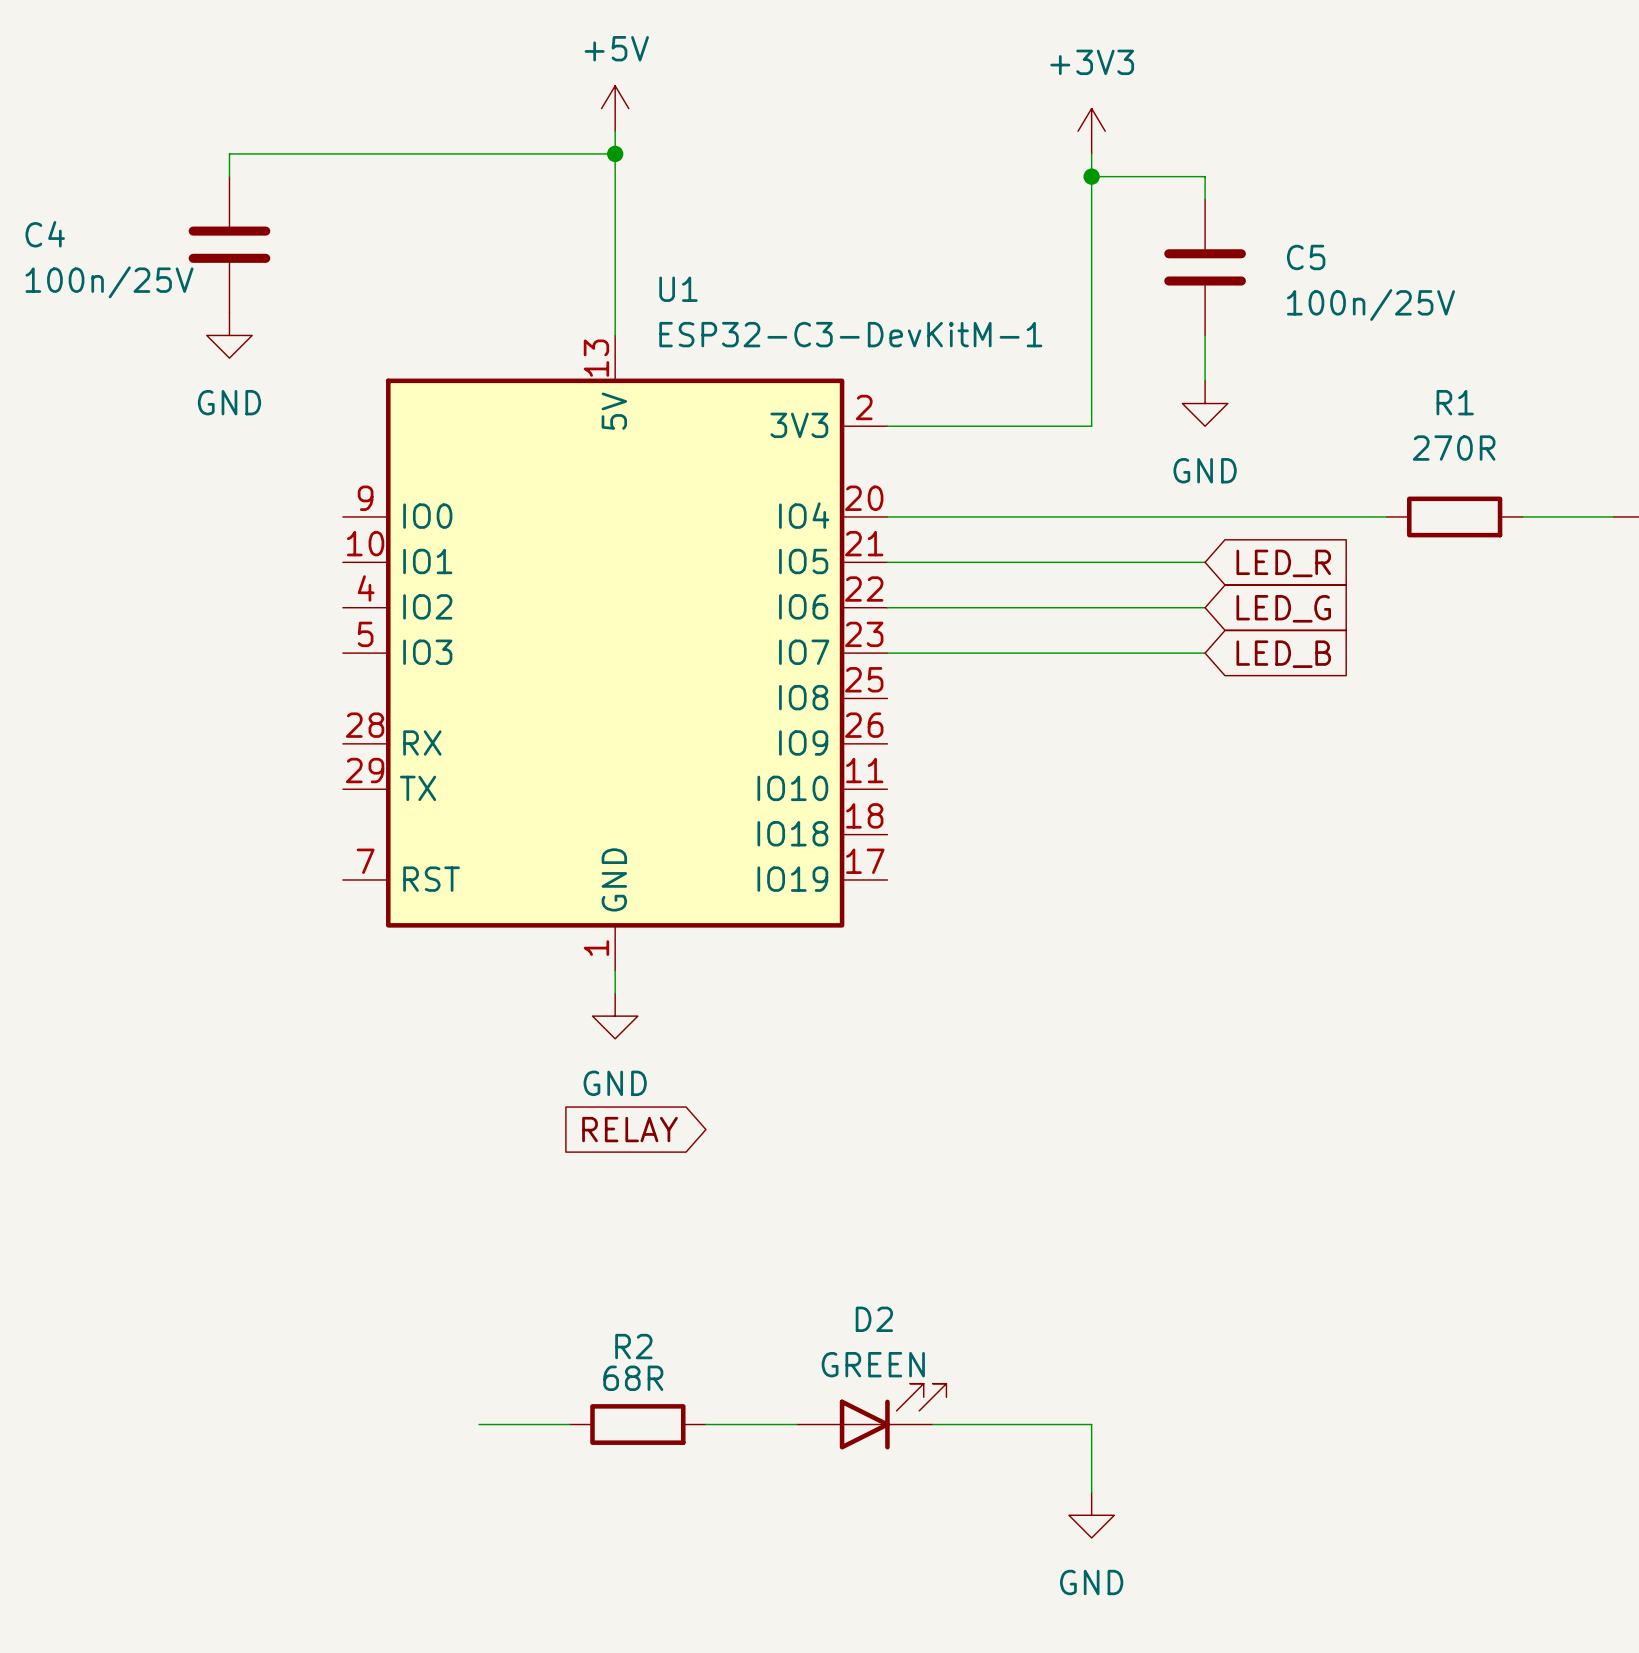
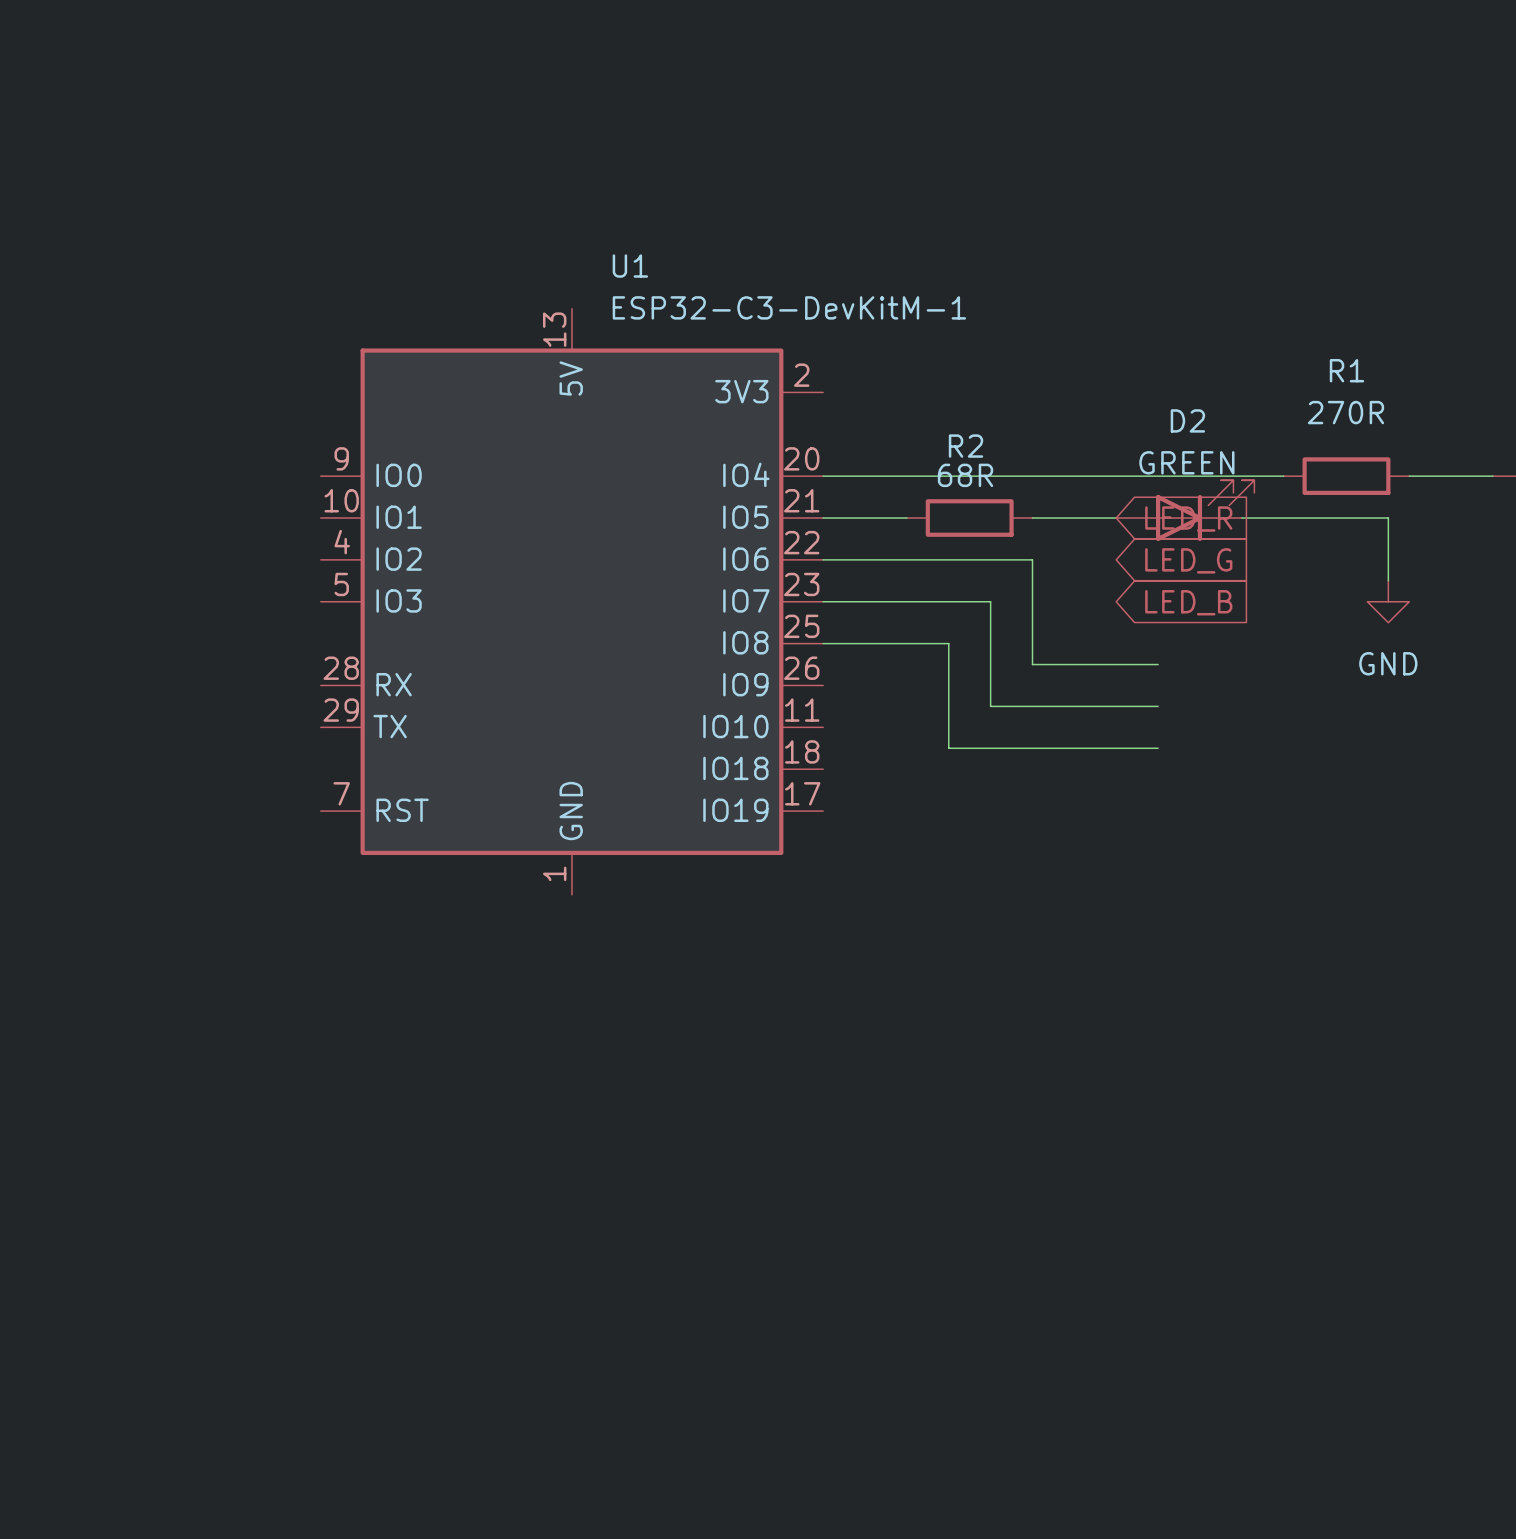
power symbol: +5V (615, 108) -> none
wire: (615, 131) (615, 335) -> none
power symbol: +3V3 (1091, 131) -> none
wire: (615, 153) (229, 153) (229, 176) -> none
junction: (615, 153) -> none
wire: (1091, 153) (1091, 426) (887, 426) -> none
wire: (1091, 176) (1205, 176) (1205, 199) -> none
junction: (1091, 176) -> none
C4: 100n/25V (229, 244) -> none
C5: 100n/25V (1205, 267) -> none
power symbol: GND (229, 335) -> none
wire: (1205, 335) (1205, 380) -> none
power symbol position: GND (1205, 403) -> GND (1388, 601)
wire: (978, 562) (1114, 562) -> none
wire: none -> (1241, 518) (1388, 518) (1388, 580)
wire: (1114, 607) (1205, 607) -> (1032, 559) (1032, 664) (1158, 664)
wire: (1068, 653) (1205, 653) -> (990, 601) (990, 706) (1158, 706)
wire: none -> (823, 643) (948, 643) (948, 748) (1158, 748)
wire: (615, 970) (615, 993) -> none
power symbol: GND (615, 1016) -> none
global label: RELAY (630, 1129) -> none
D2 position: (871, 1416) -> (1185, 510)
wire: (479, 1424) (569, 1424) -> none
R2 position: (637, 1424) -> (969, 518)
wire: (705, 1424) (796, 1424) -> none
wire: (932, 1424) (1091, 1424) (1091, 1492) -> none
power symbol: GND (1091, 1515) -> none

